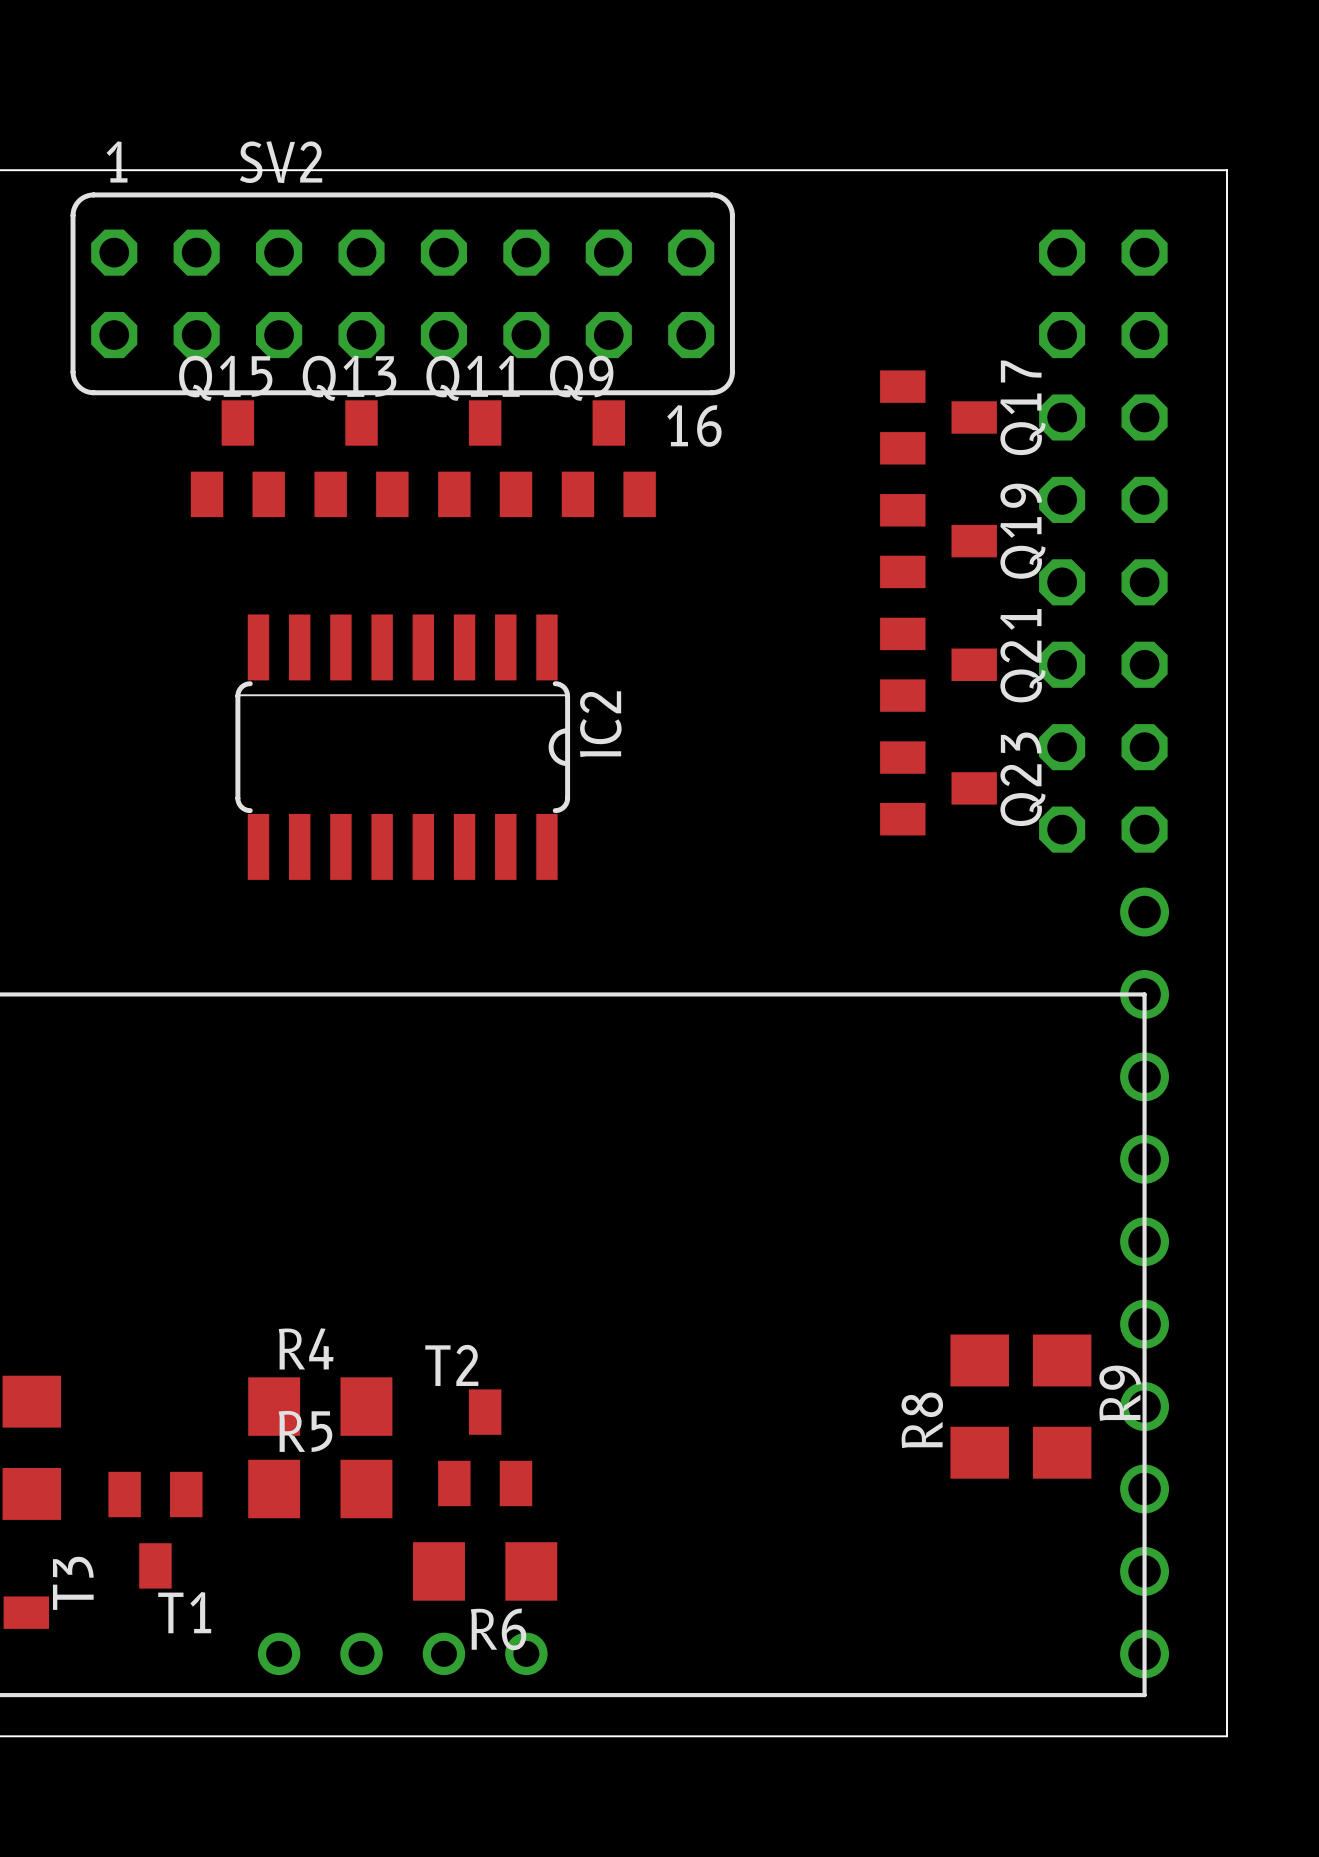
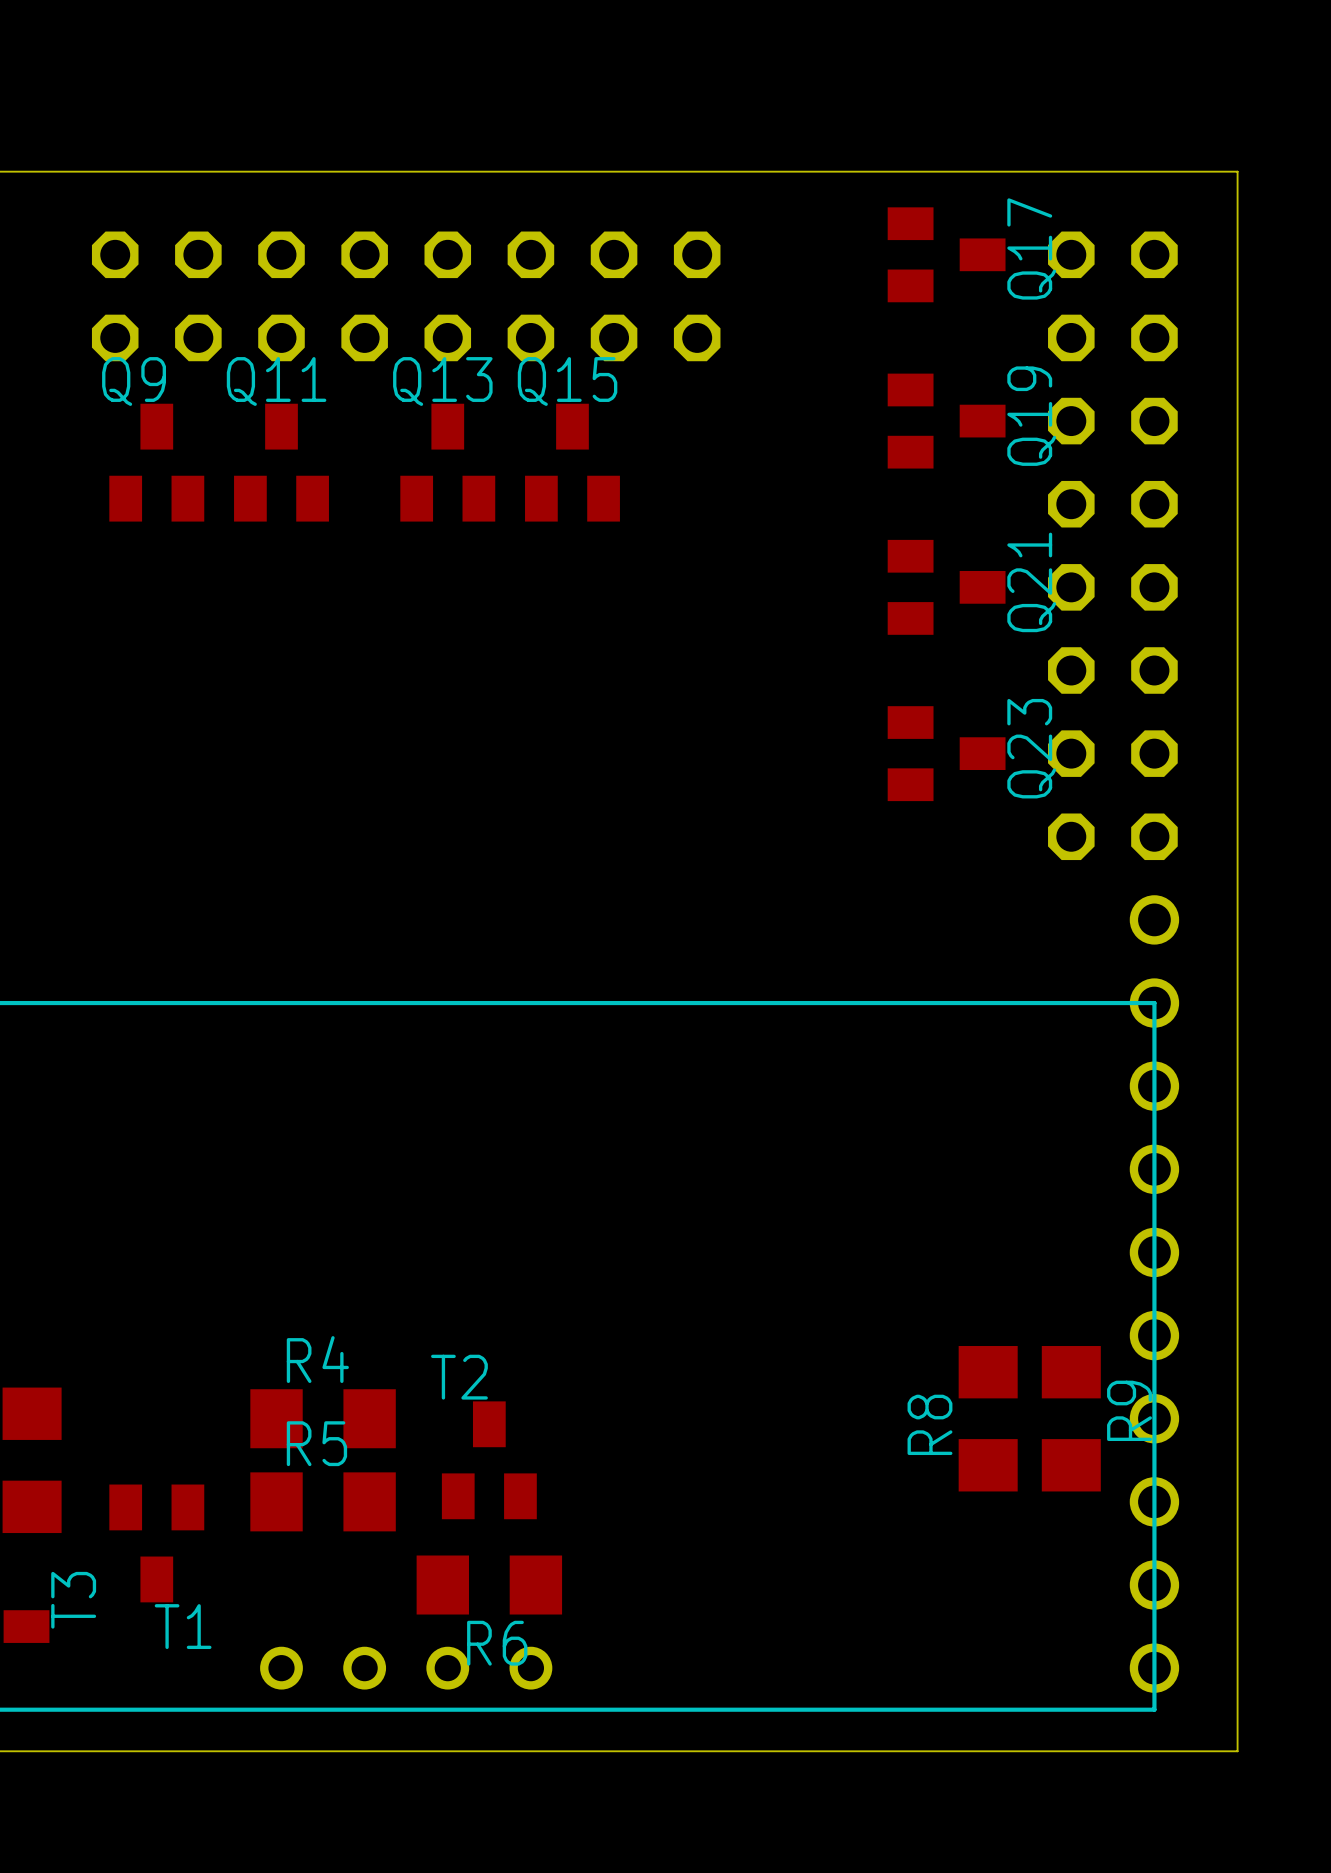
Q17: none -> (946, 254)
SV2 side: top (402, 293) -> bottom (406, 296)
Q17 name: Q17 (1022, 407) -> Q19 (1031, 416)
Q15 position: (237, 458) -> (572, 462)
Q13 position: (361, 458) -> (447, 462)
Q11 position: (485, 458) -> (281, 462)
Q9 position: (608, 458) -> (156, 462)
Q19: (938, 541) -> none
Q21 position: (938, 664) -> (946, 587)
IC2: (402, 747) -> none
Q23 position: (938, 788) -> (946, 753)

